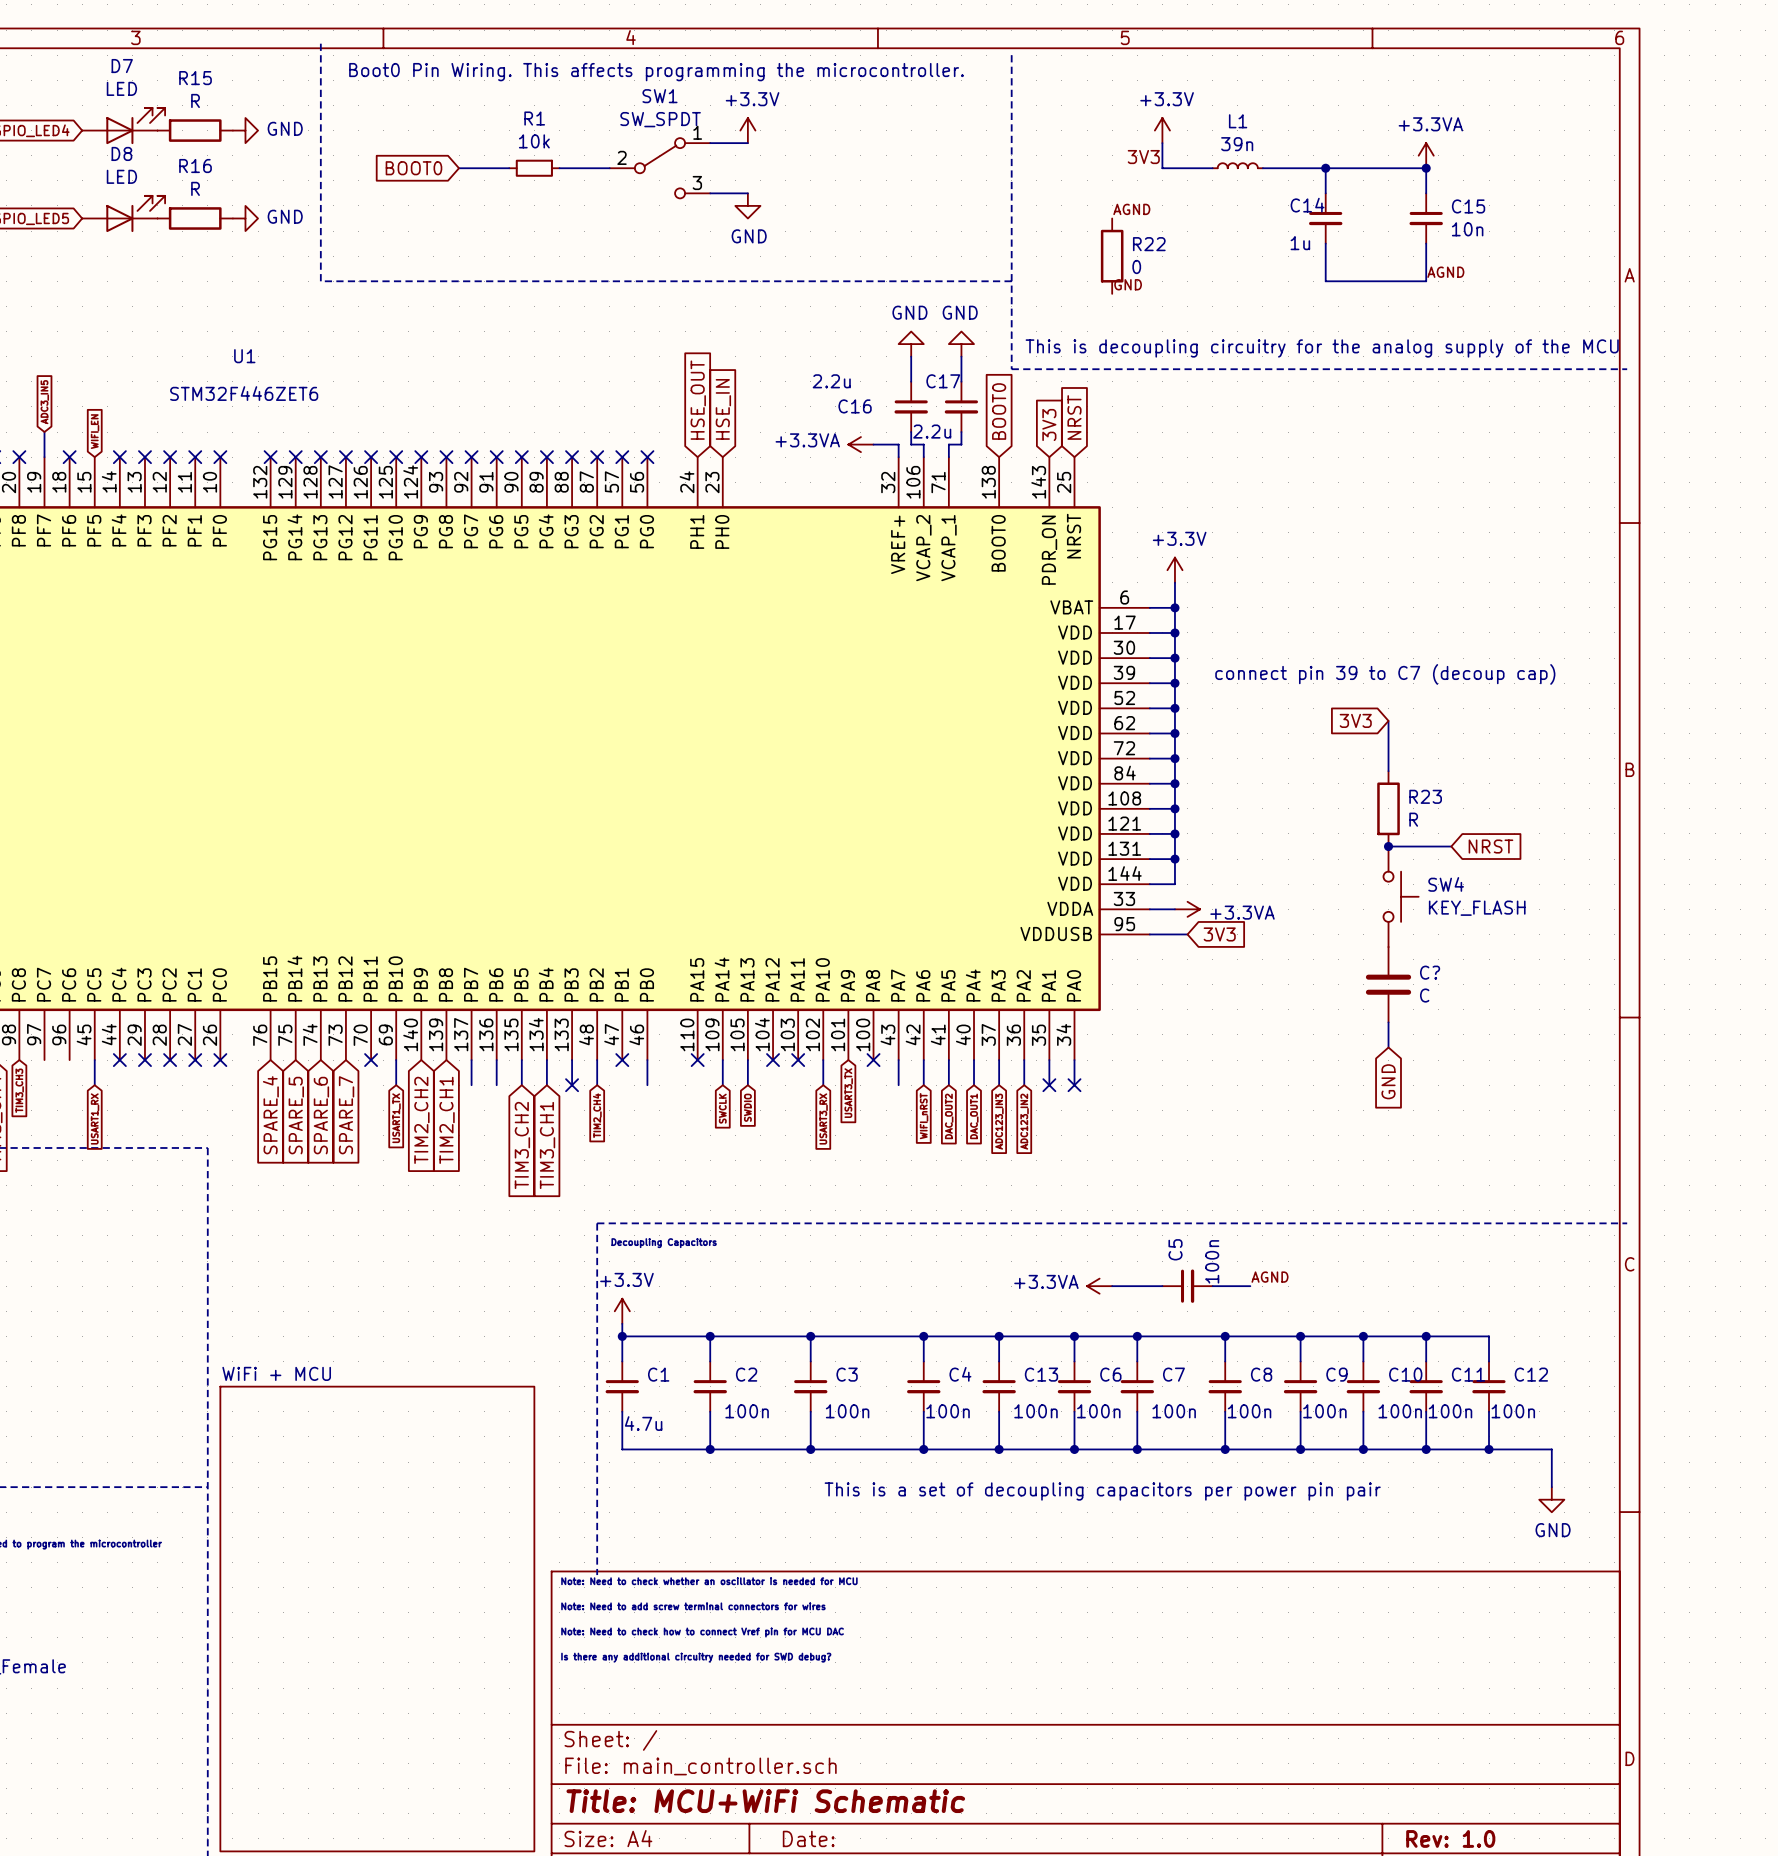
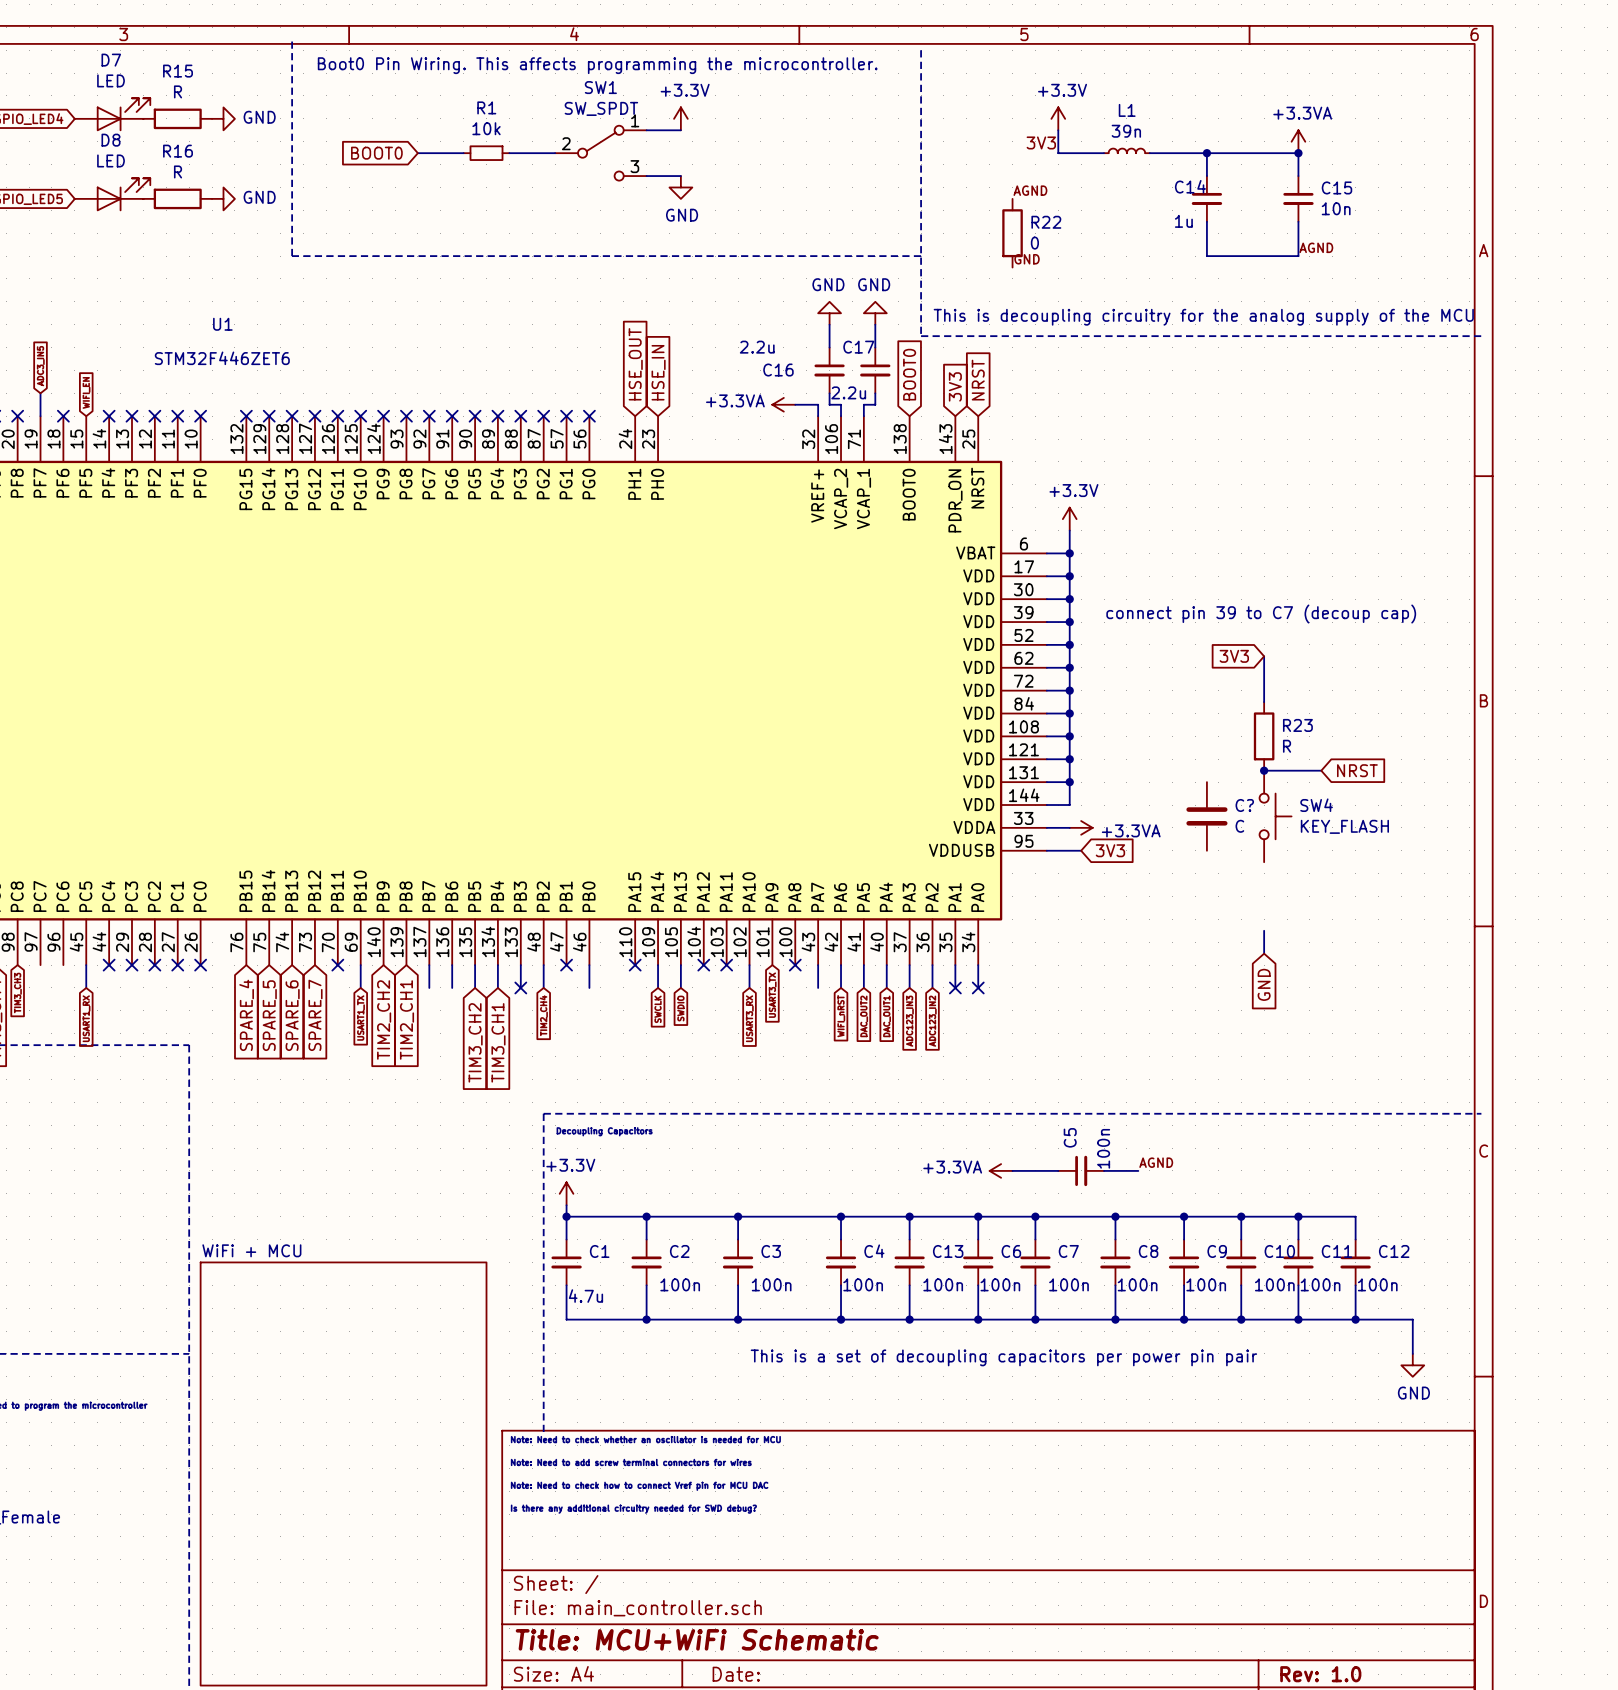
C? position: (1388, 984) -> (1206, 816)

